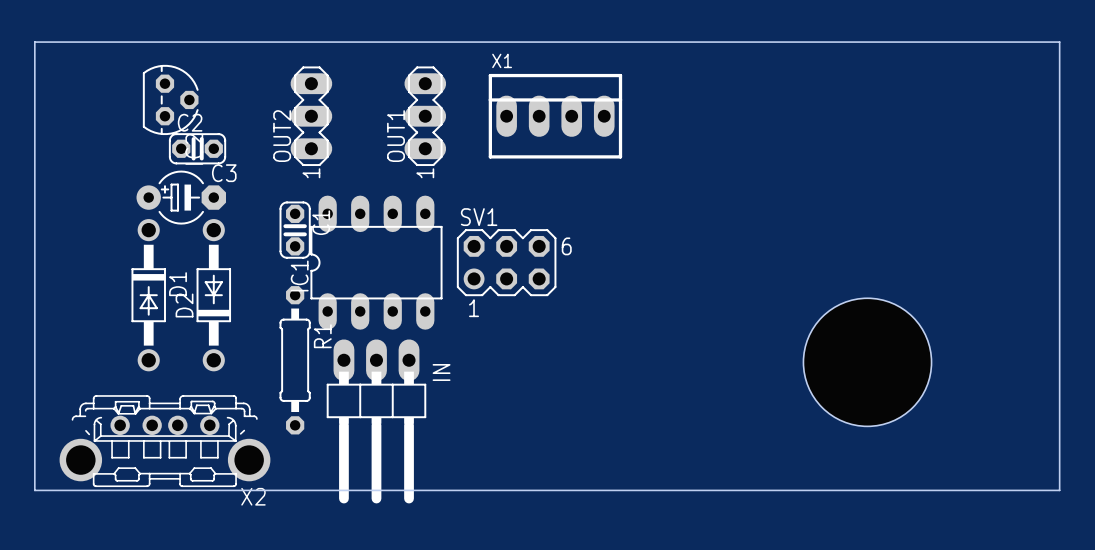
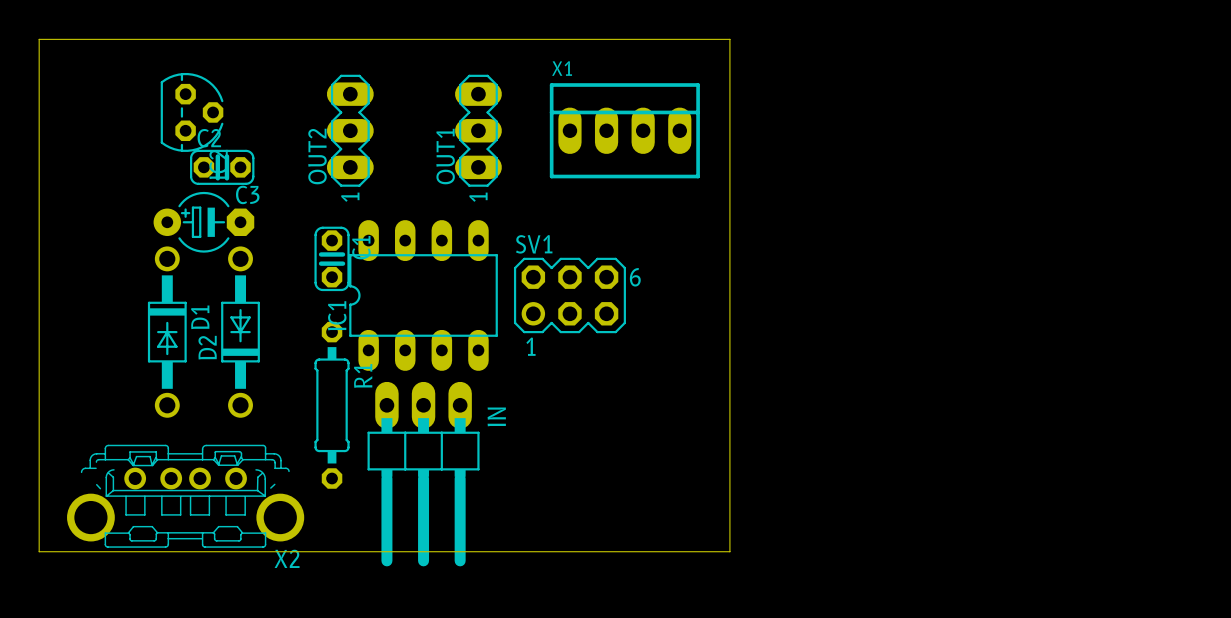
board edge: (34, 42) (1059, 42) (1059, 490) (648, 490) -> (39, 47) (39, 39) (729, 39) (729, 551)
hole: (867, 362) -> none

